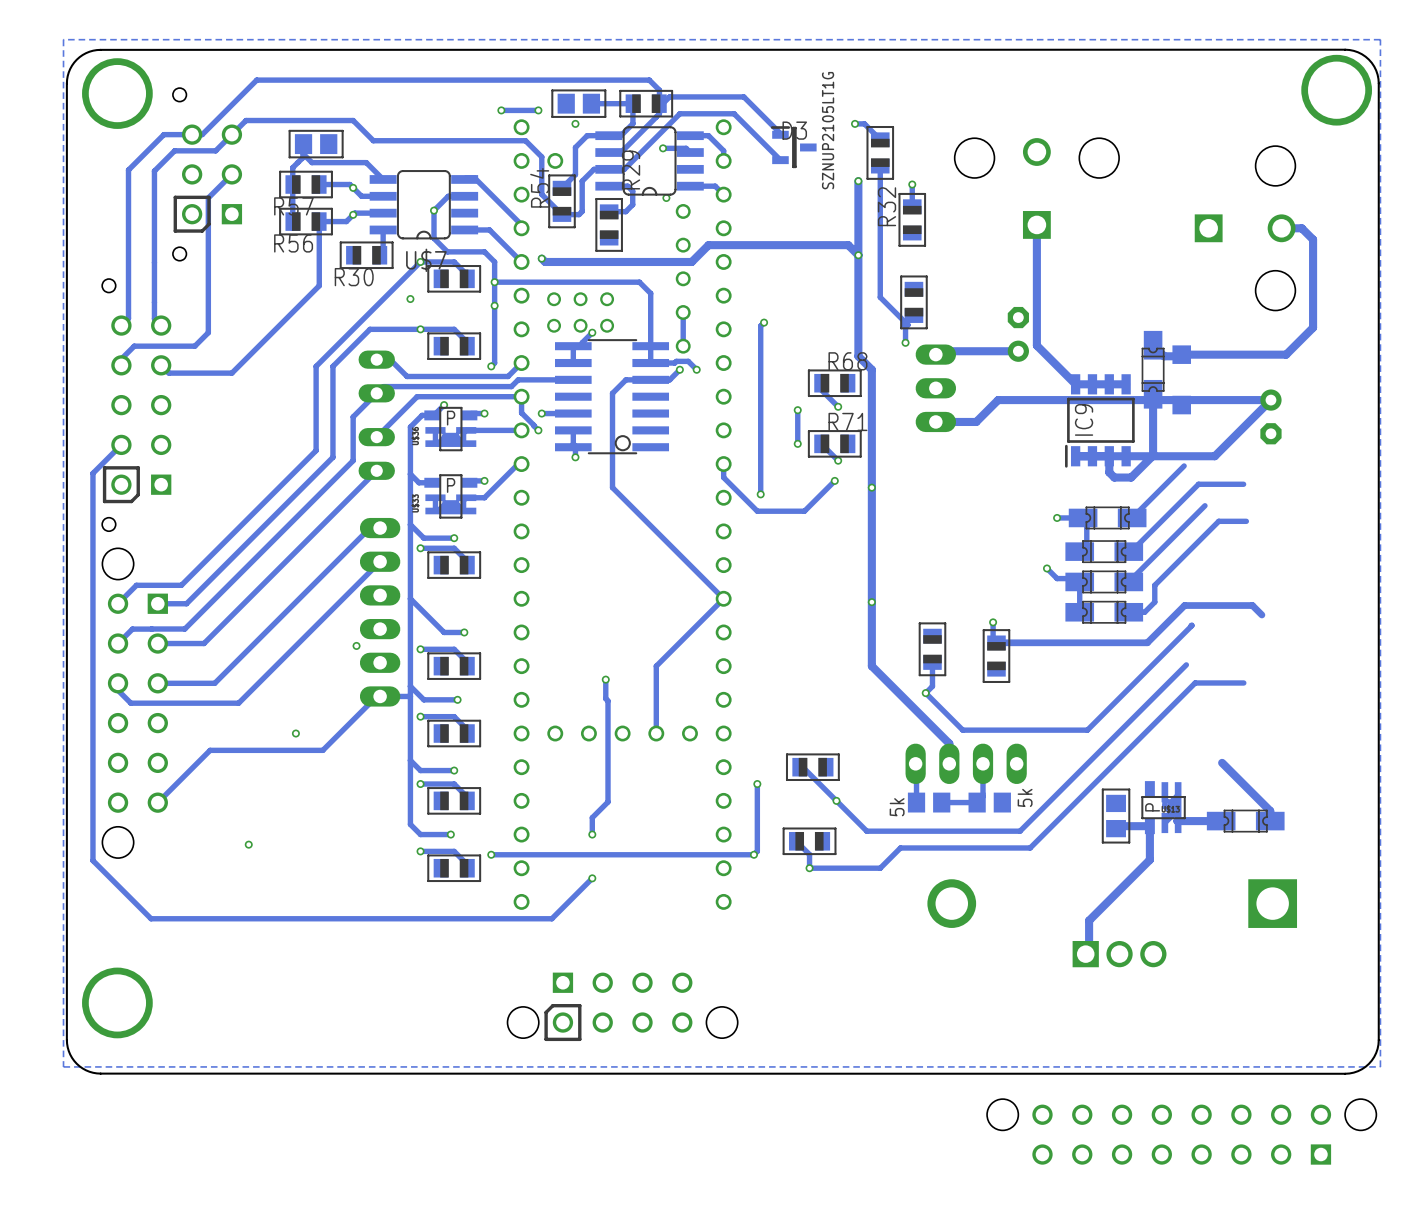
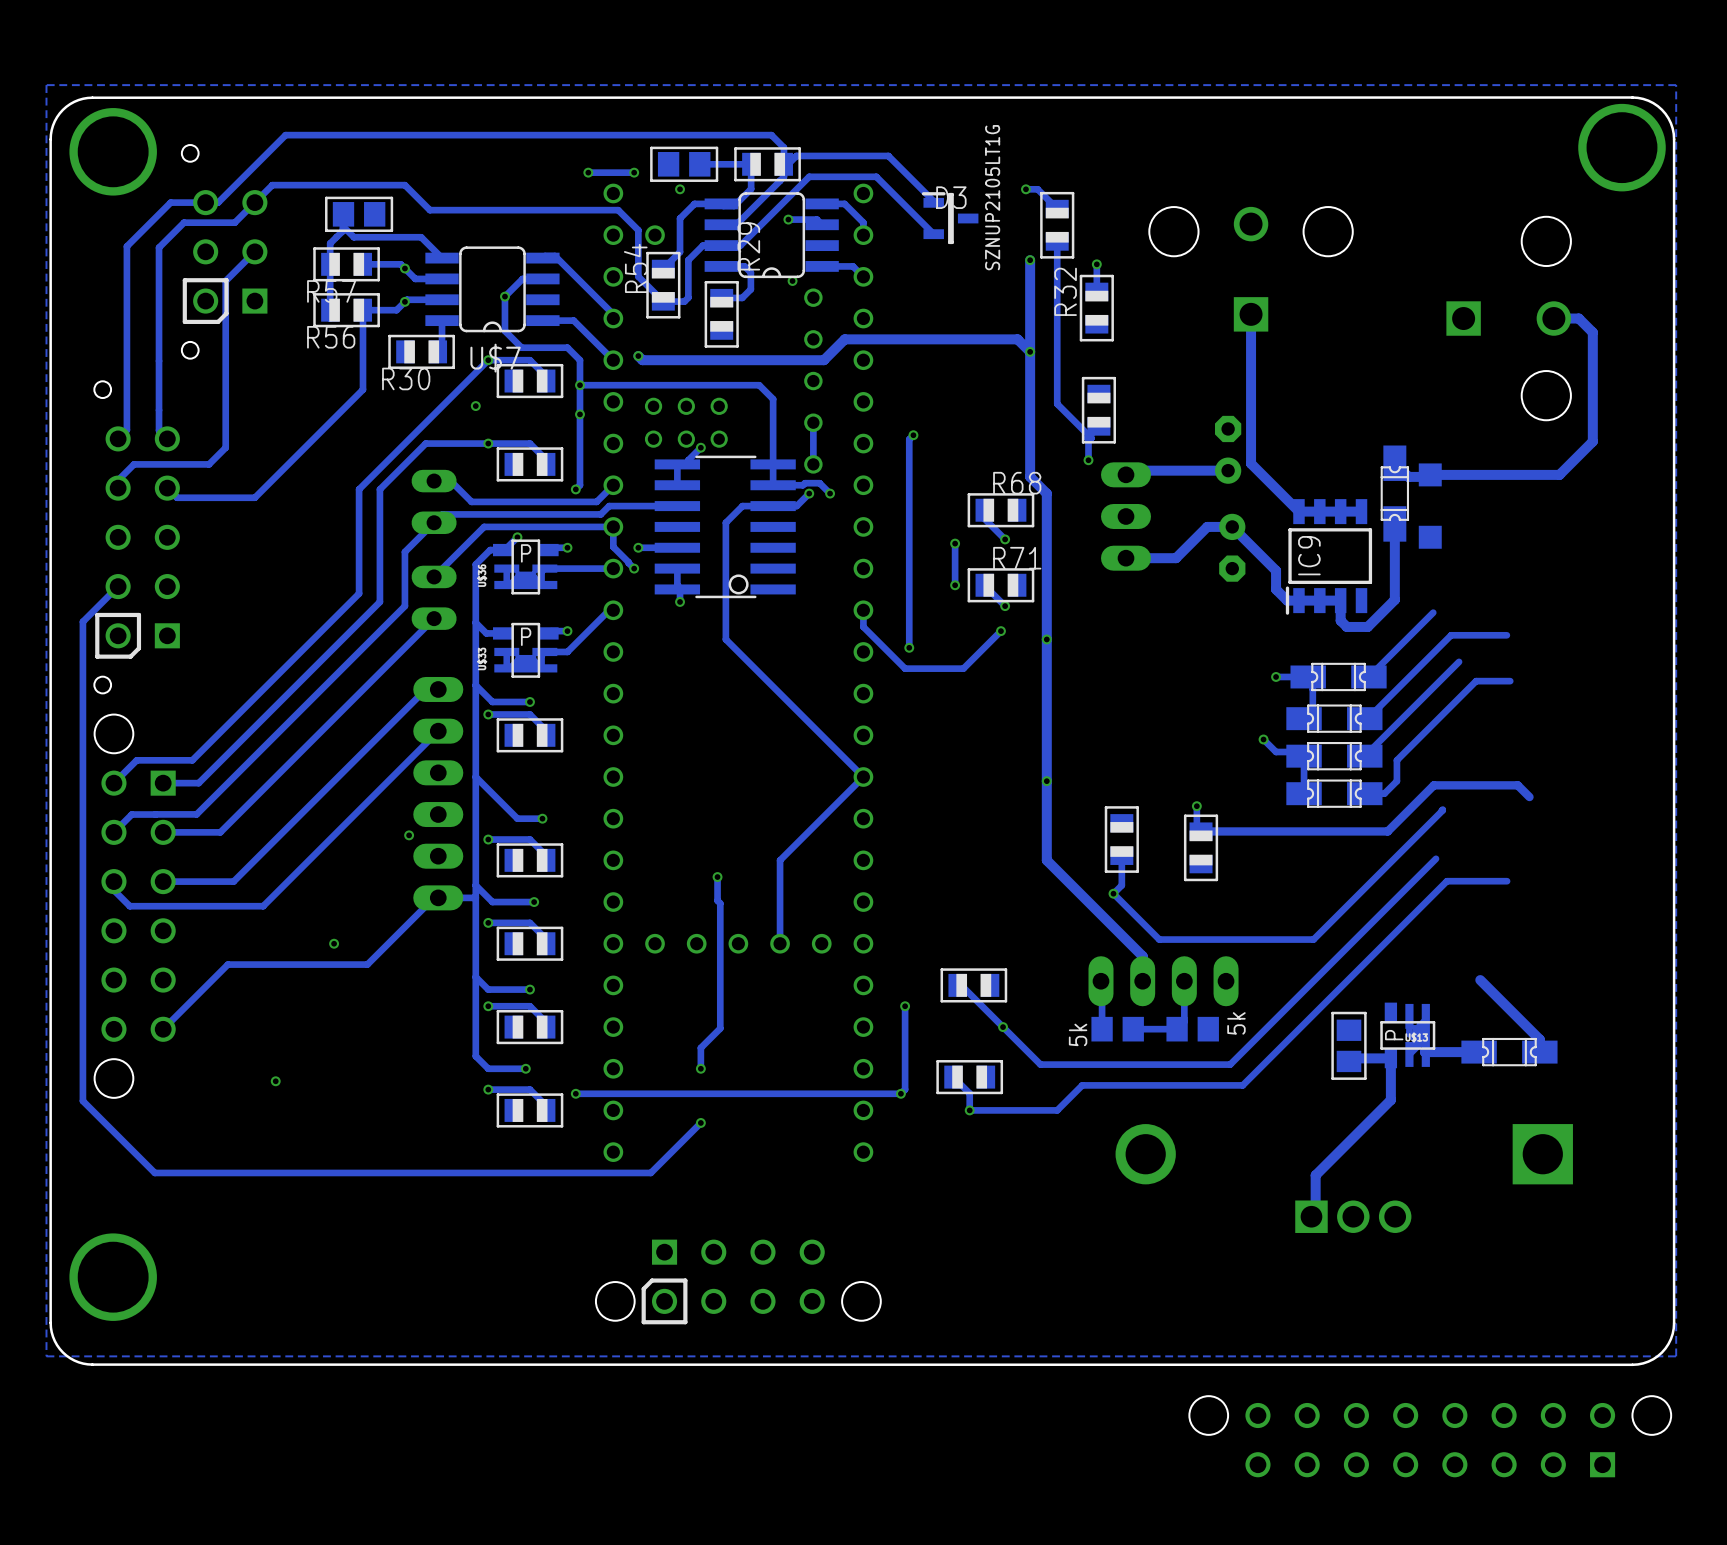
track: (998, 400) (1270, 400) (1214, 456) (1109, 456) -> (1203, 531) (1207, 526) (1232, 526) (1276, 570) (1276, 589) (1287, 600) (1298, 600)
part position: (1270, 416) -> (1232, 547)

